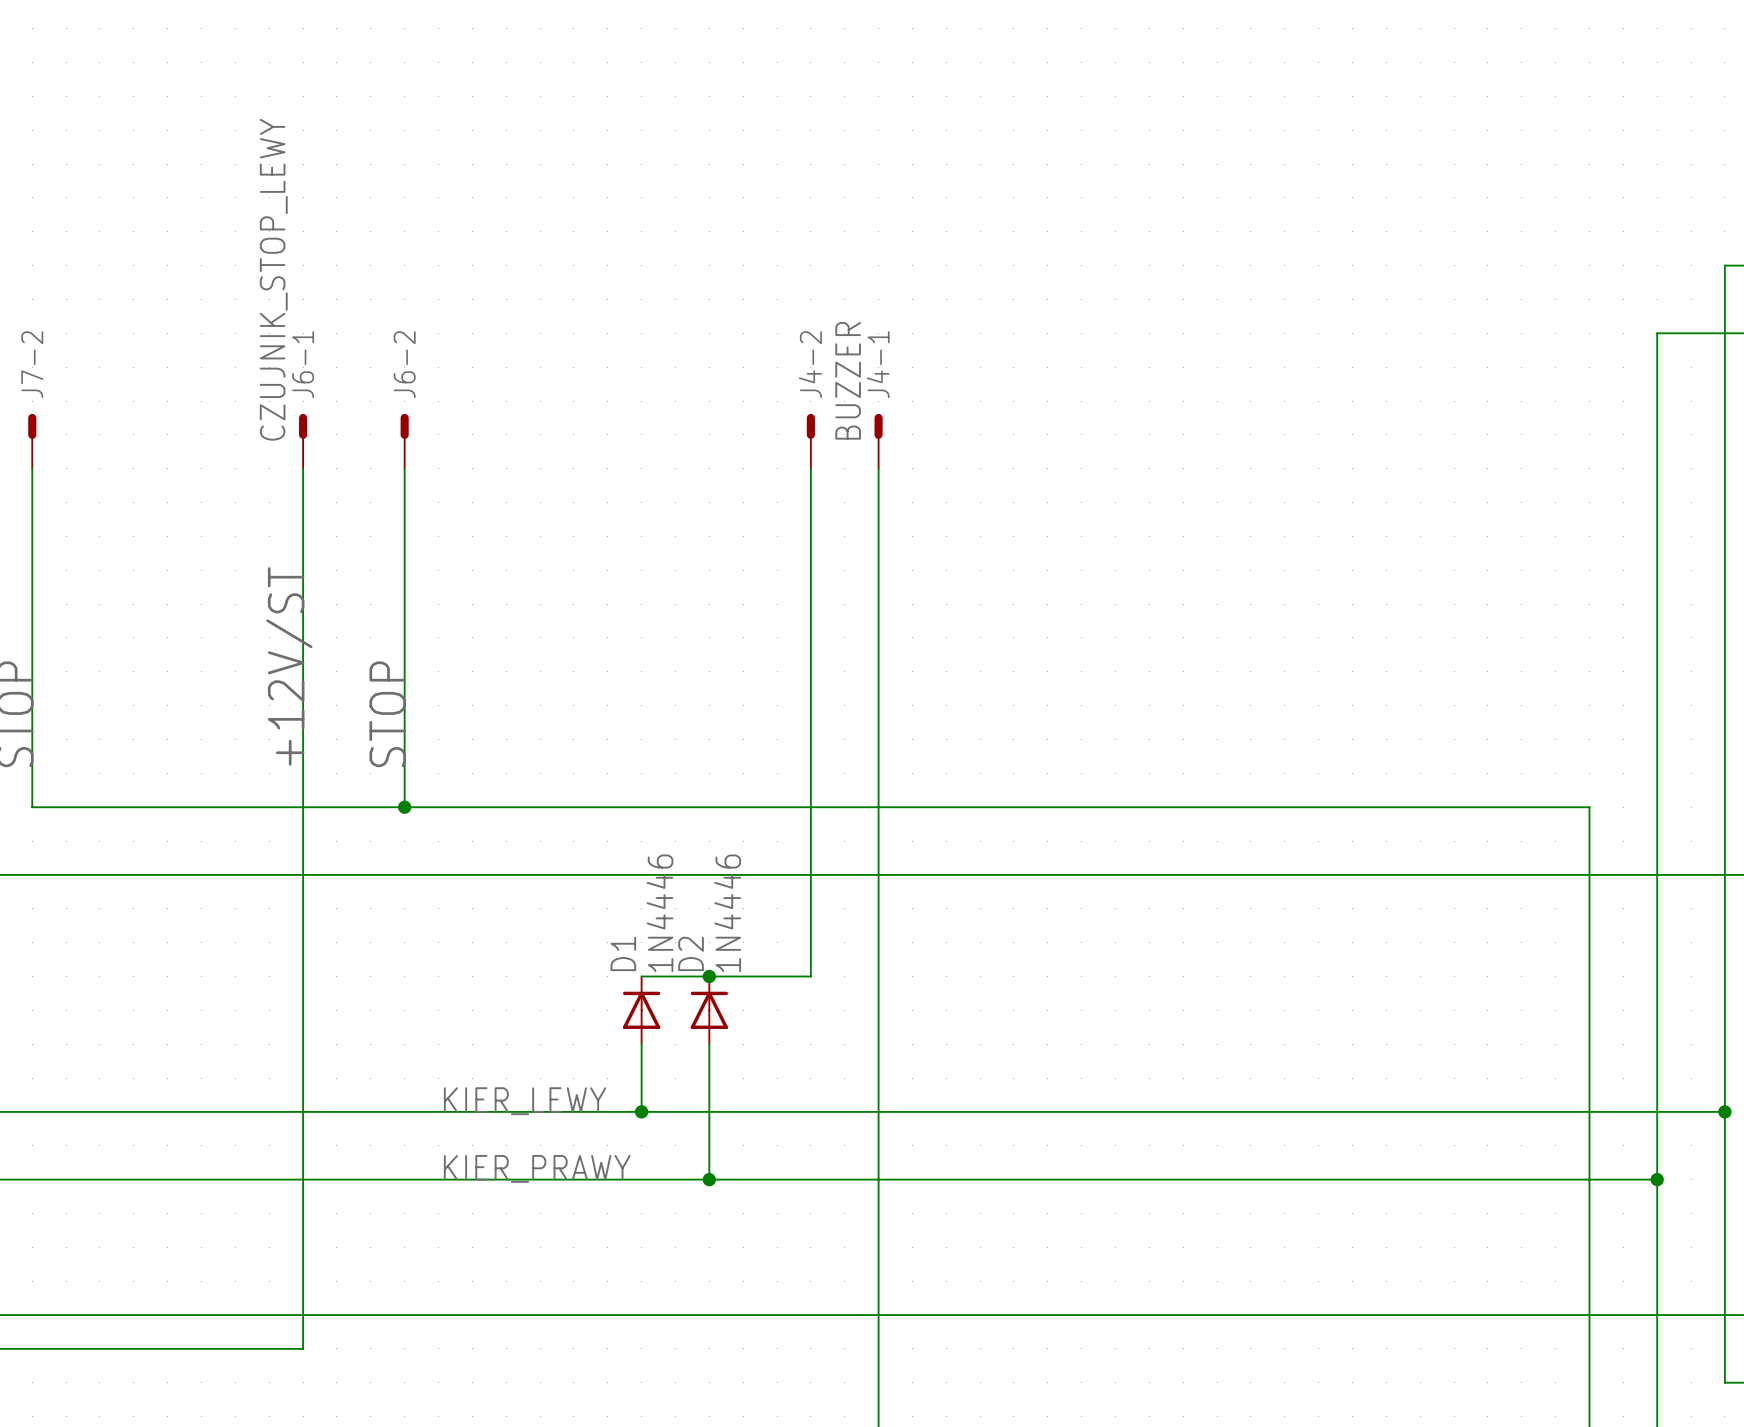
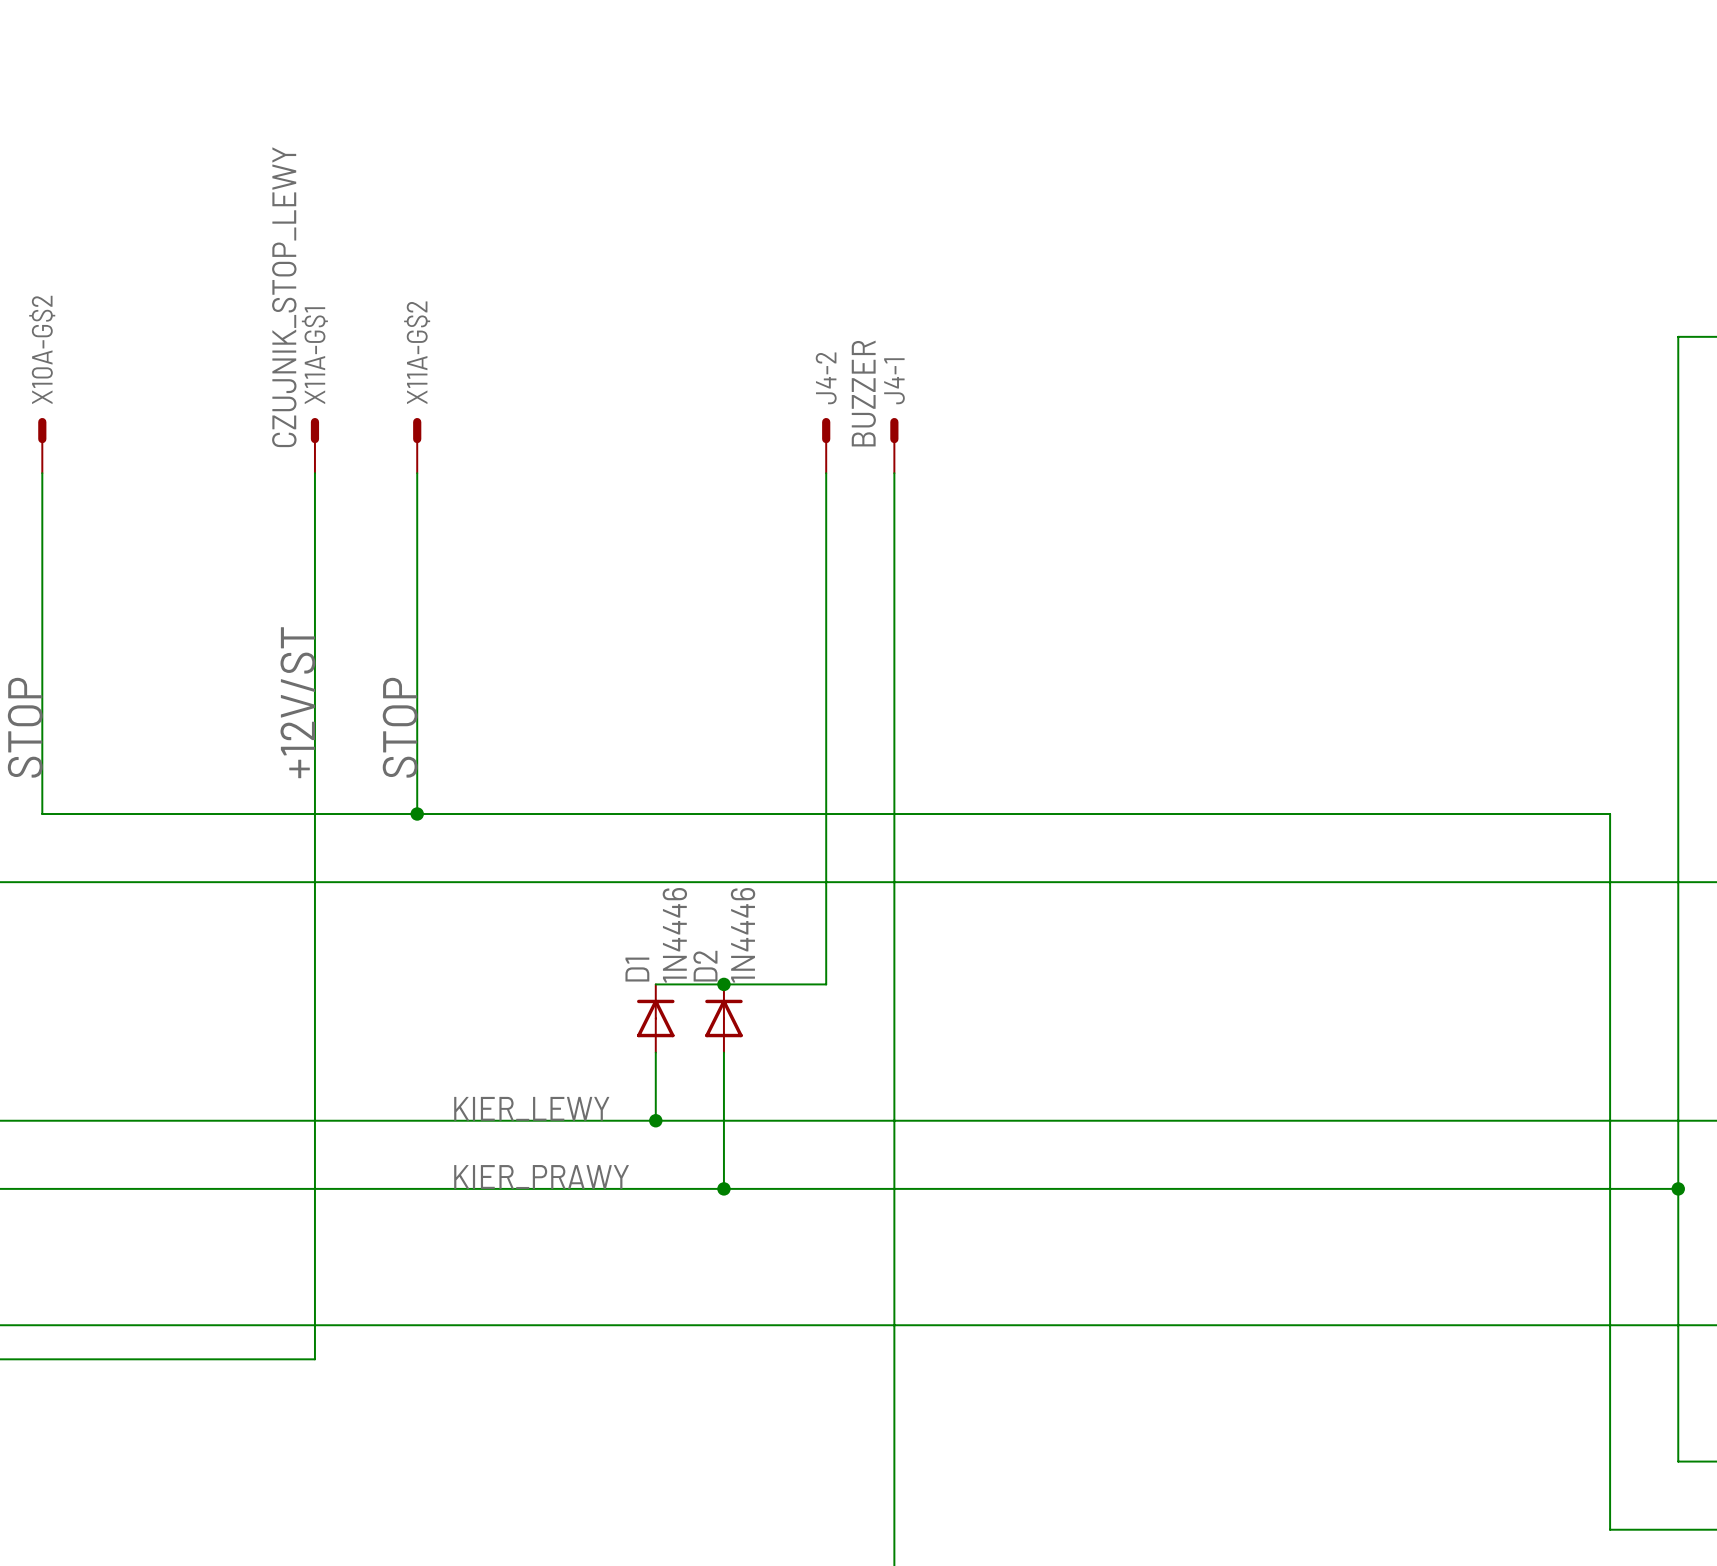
J7-2 name: J7-2 (32, 364) -> X10A-G$2 (42, 349)
J6-1 name: J6-1 (303, 364) -> X11A-G$1 (314, 355)
J6-2 name: J6-2 (404, 364) -> X11A-G$2 (417, 352)

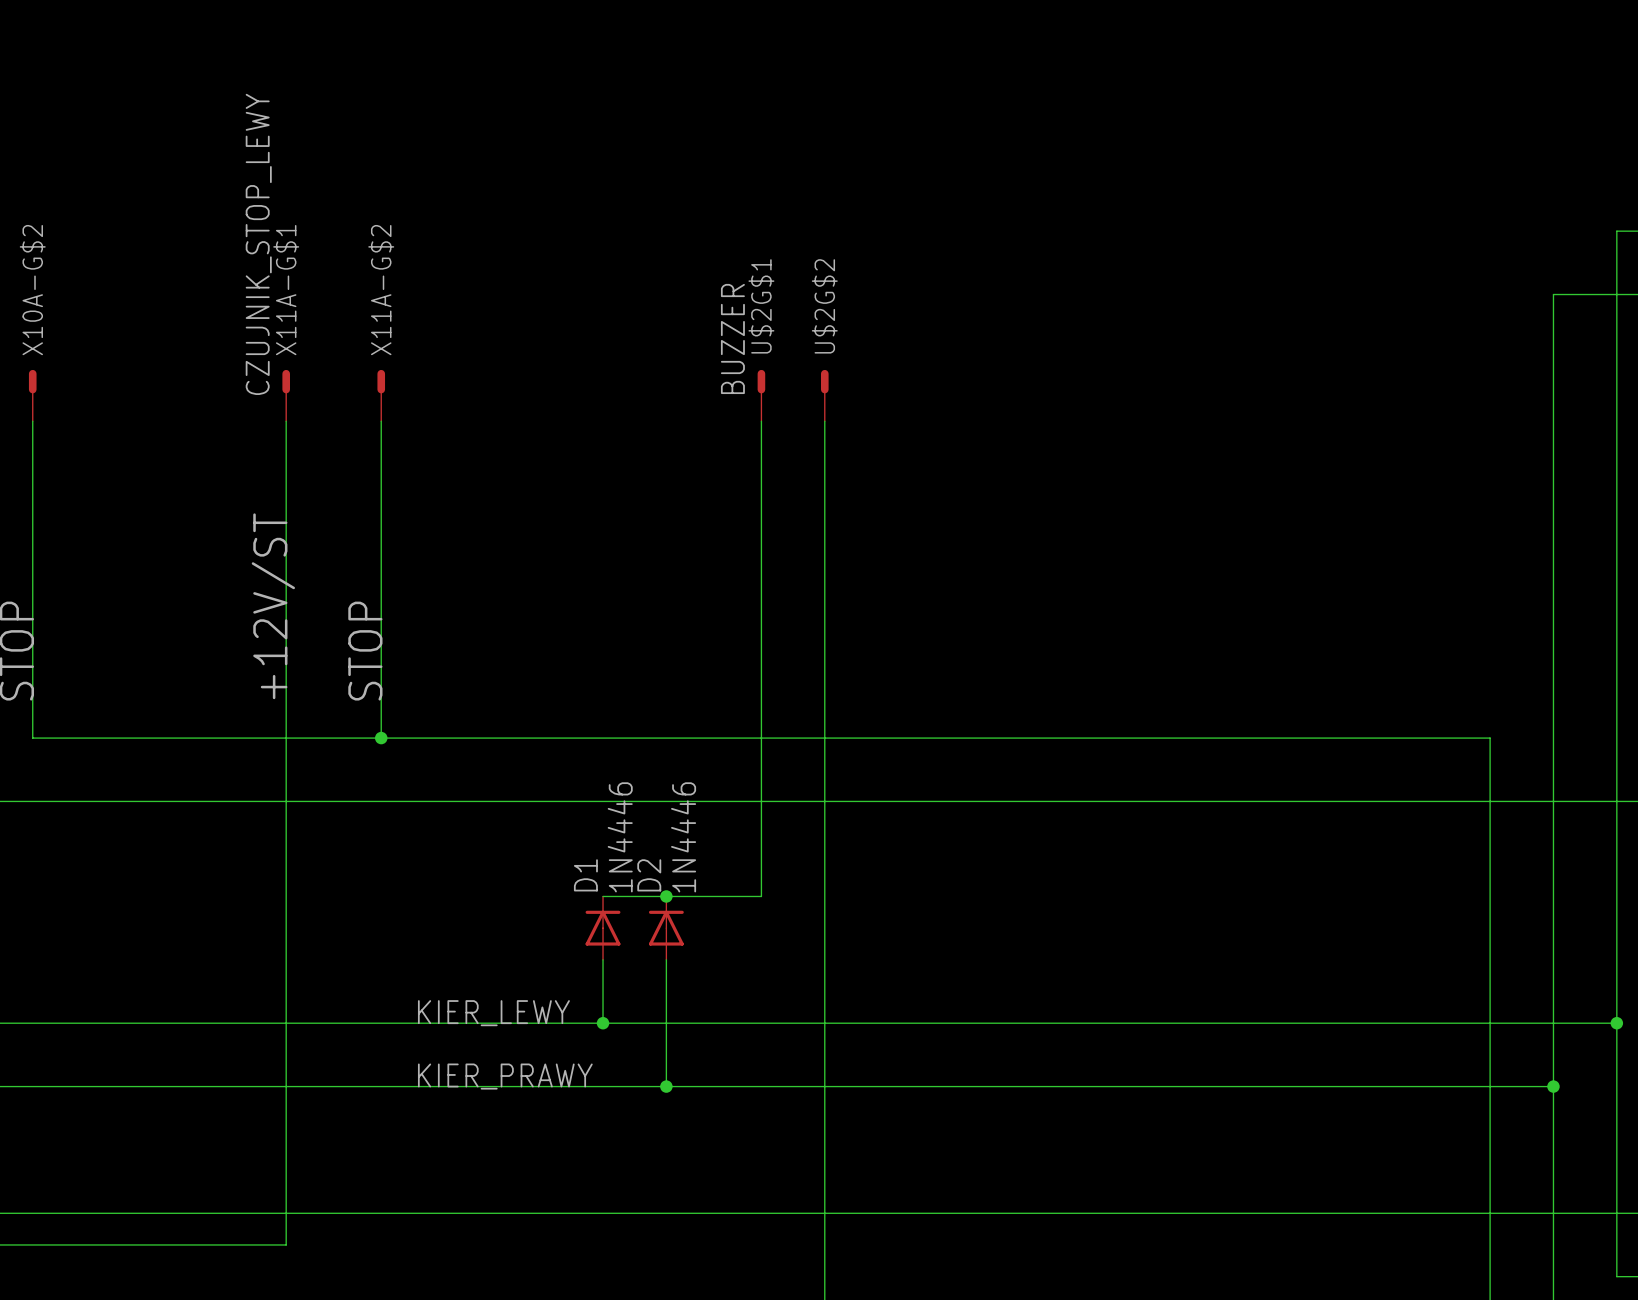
J4-2 name: J4-2 (826, 378) -> U$2G$1 (761, 306)
J4-1 name: J4-1 (894, 381) -> U$2G$2 (824, 306)
J4-2 value: none -> BUZZER (732, 338)
J4-1 value: BUZZER (863, 393) -> none

